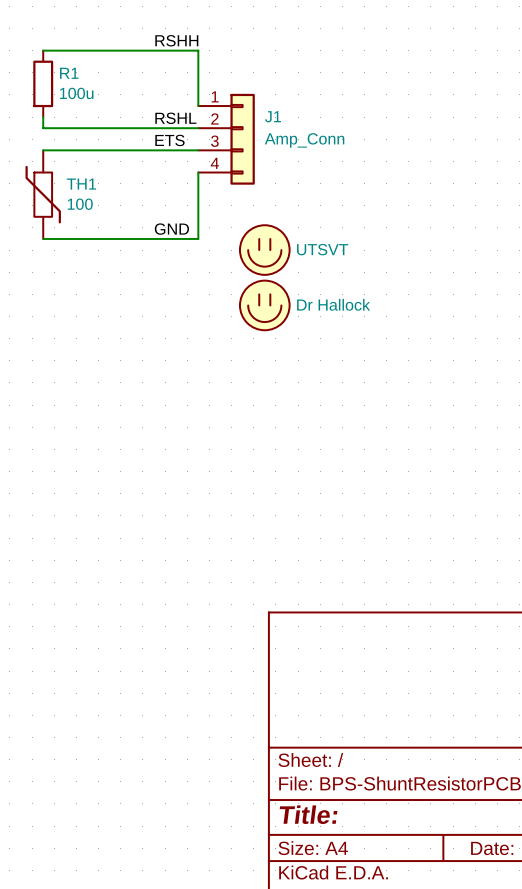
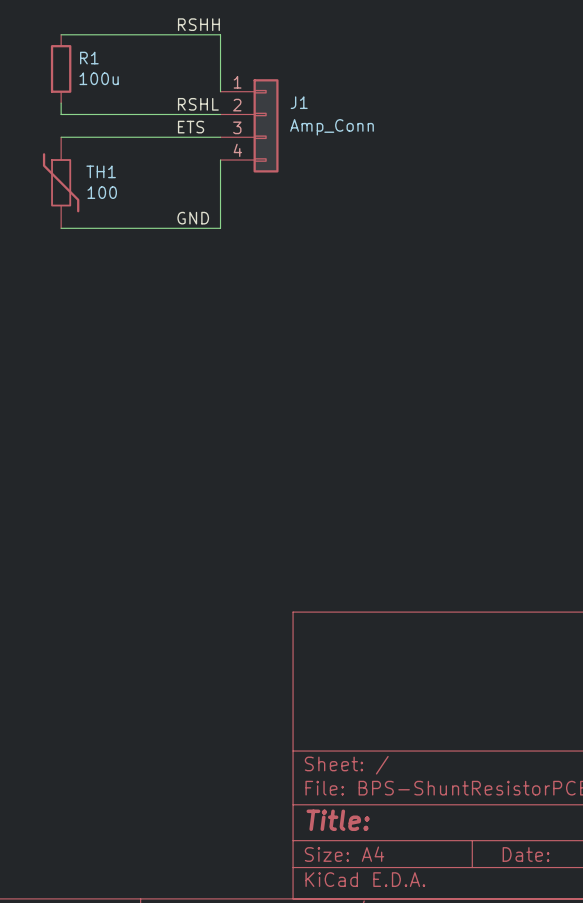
part: UTSVT (264, 250) -> none
part: Dr Hallock (264, 305) -> none

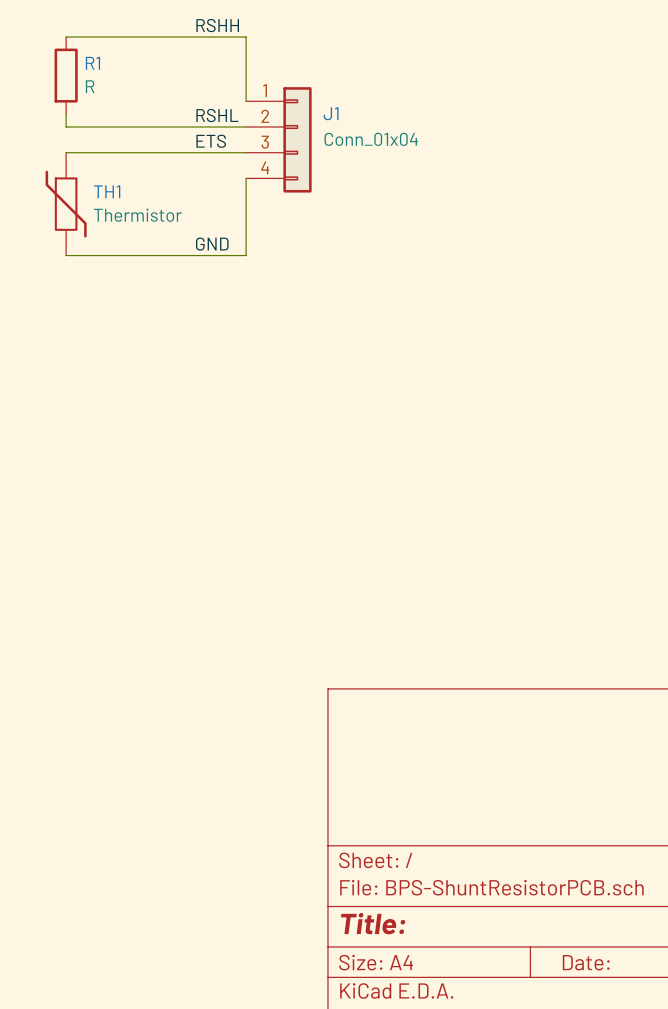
R1 value: 100u (99, 78) -> R (90, 86)
J1 value: Amp_Conn (331, 127) -> Conn_01x04 (371, 139)
TH1 value: 100 (102, 192) -> Thermistor (137, 215)

